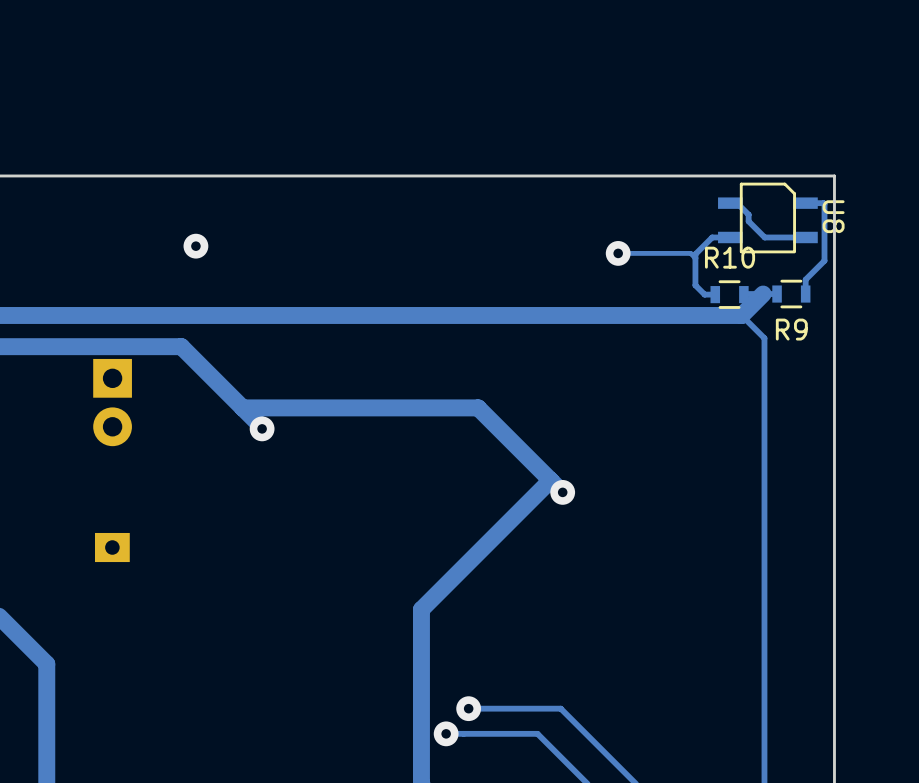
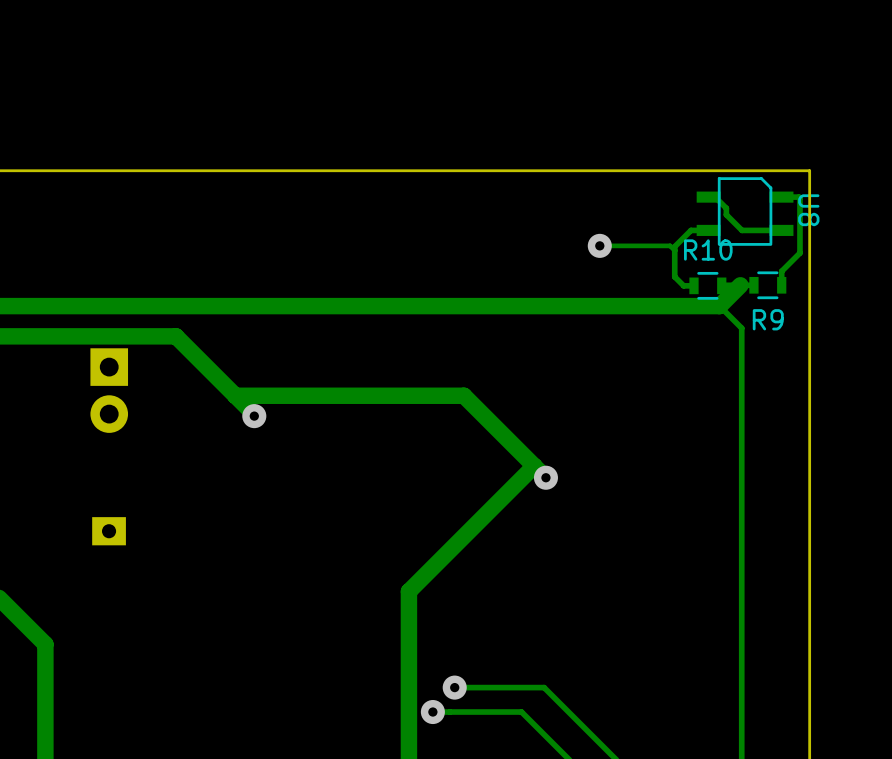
via: (195, 246) -> none

